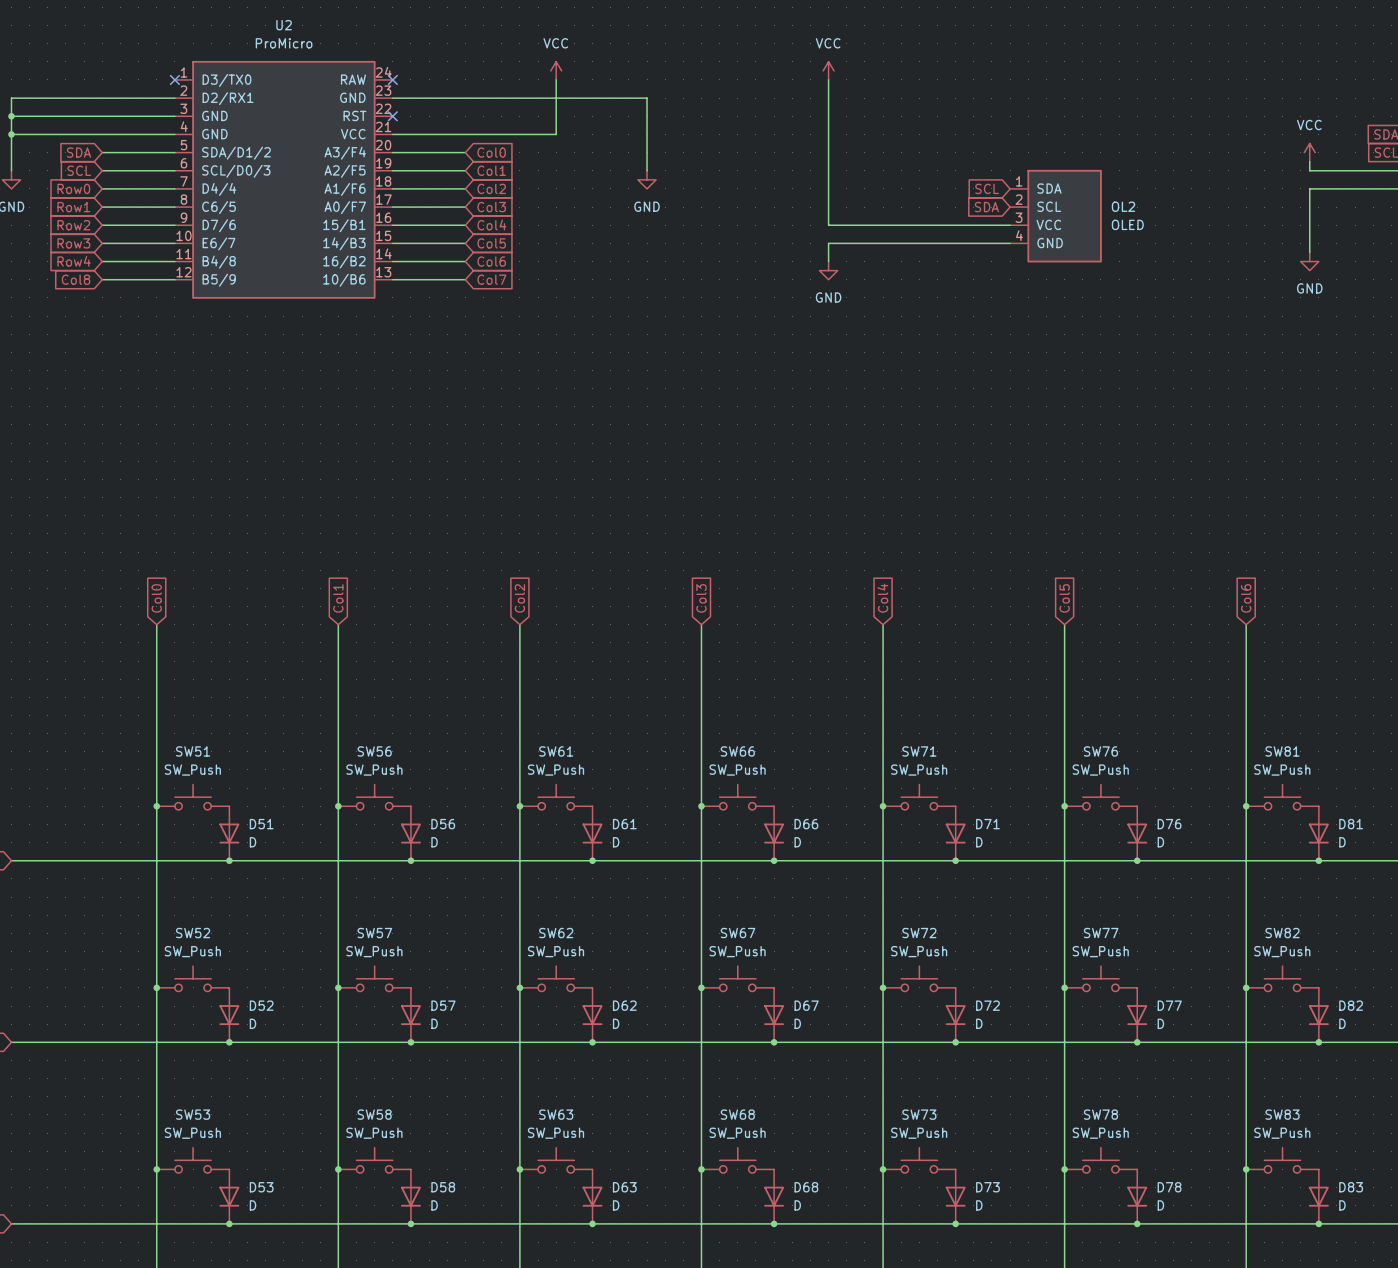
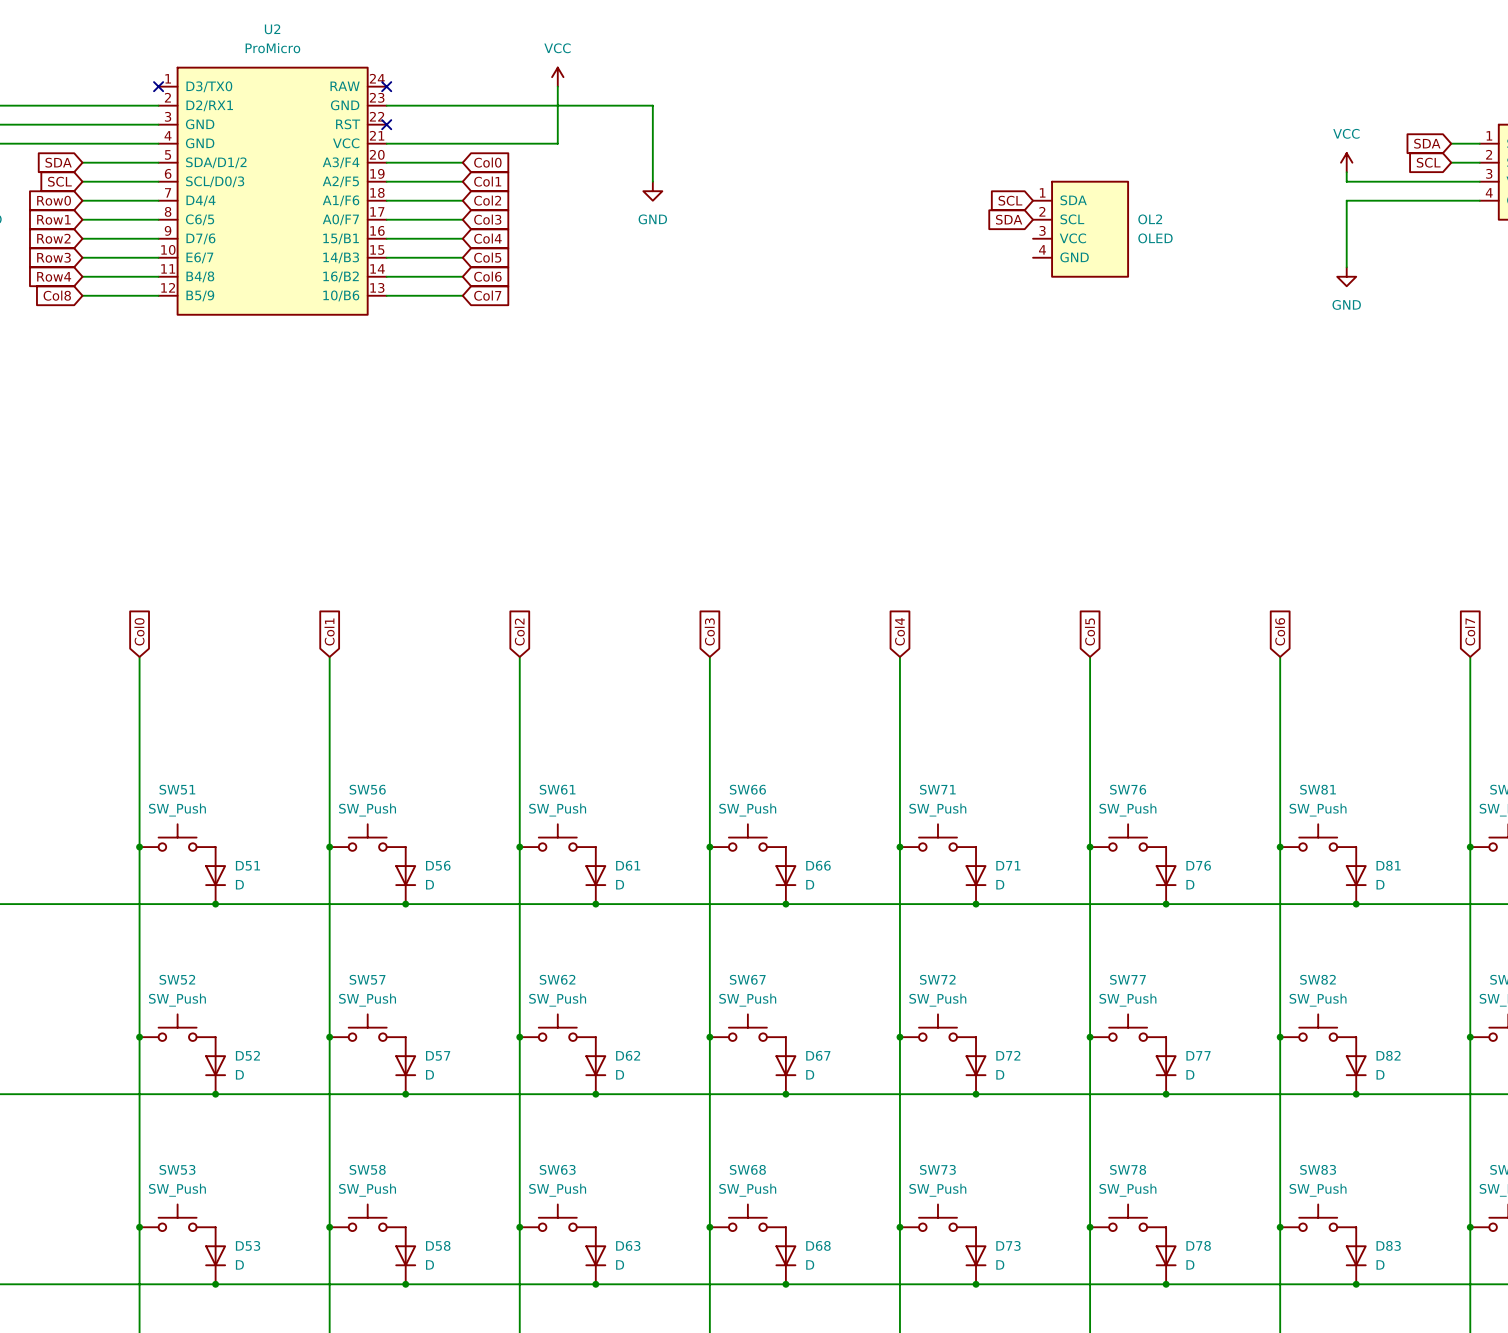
power symbol: VCC (828, 70) -> none
wire: (828, 79) (828, 225) (1010, 225) -> none
wire: (1010, 243) (828, 243) (828, 261) -> none
power symbol: GND (828, 270) -> none

